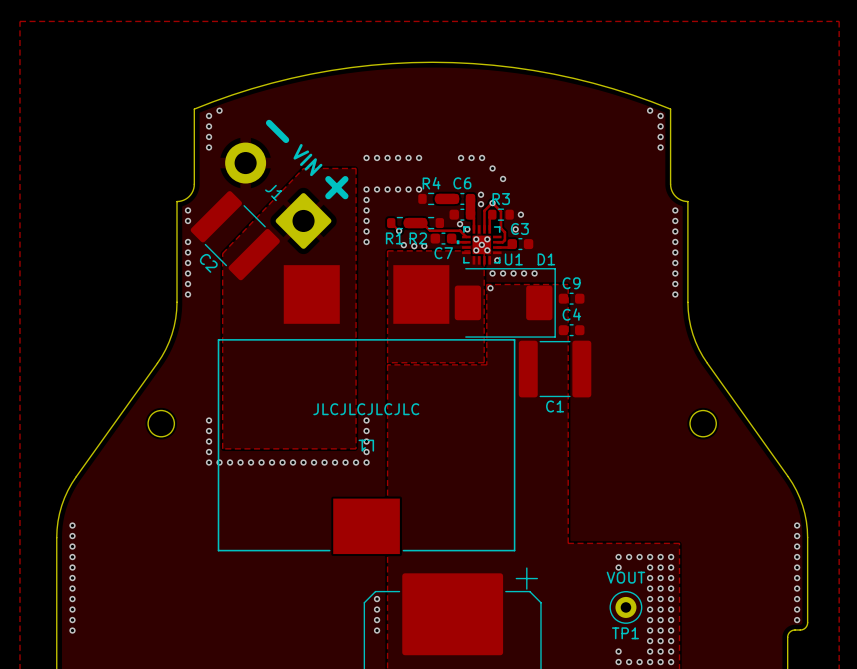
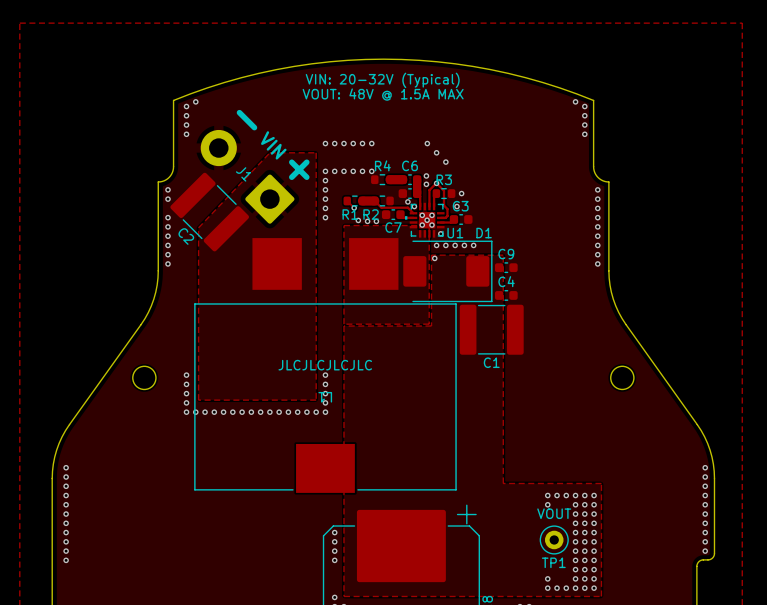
text: none -> VIN: 20-32V (Typical) (382, 80)
text: none -> VOUT: 48V @ 1.5A MAX (383, 94)
via: (461, 157) -> none
via: (471, 157) -> none

